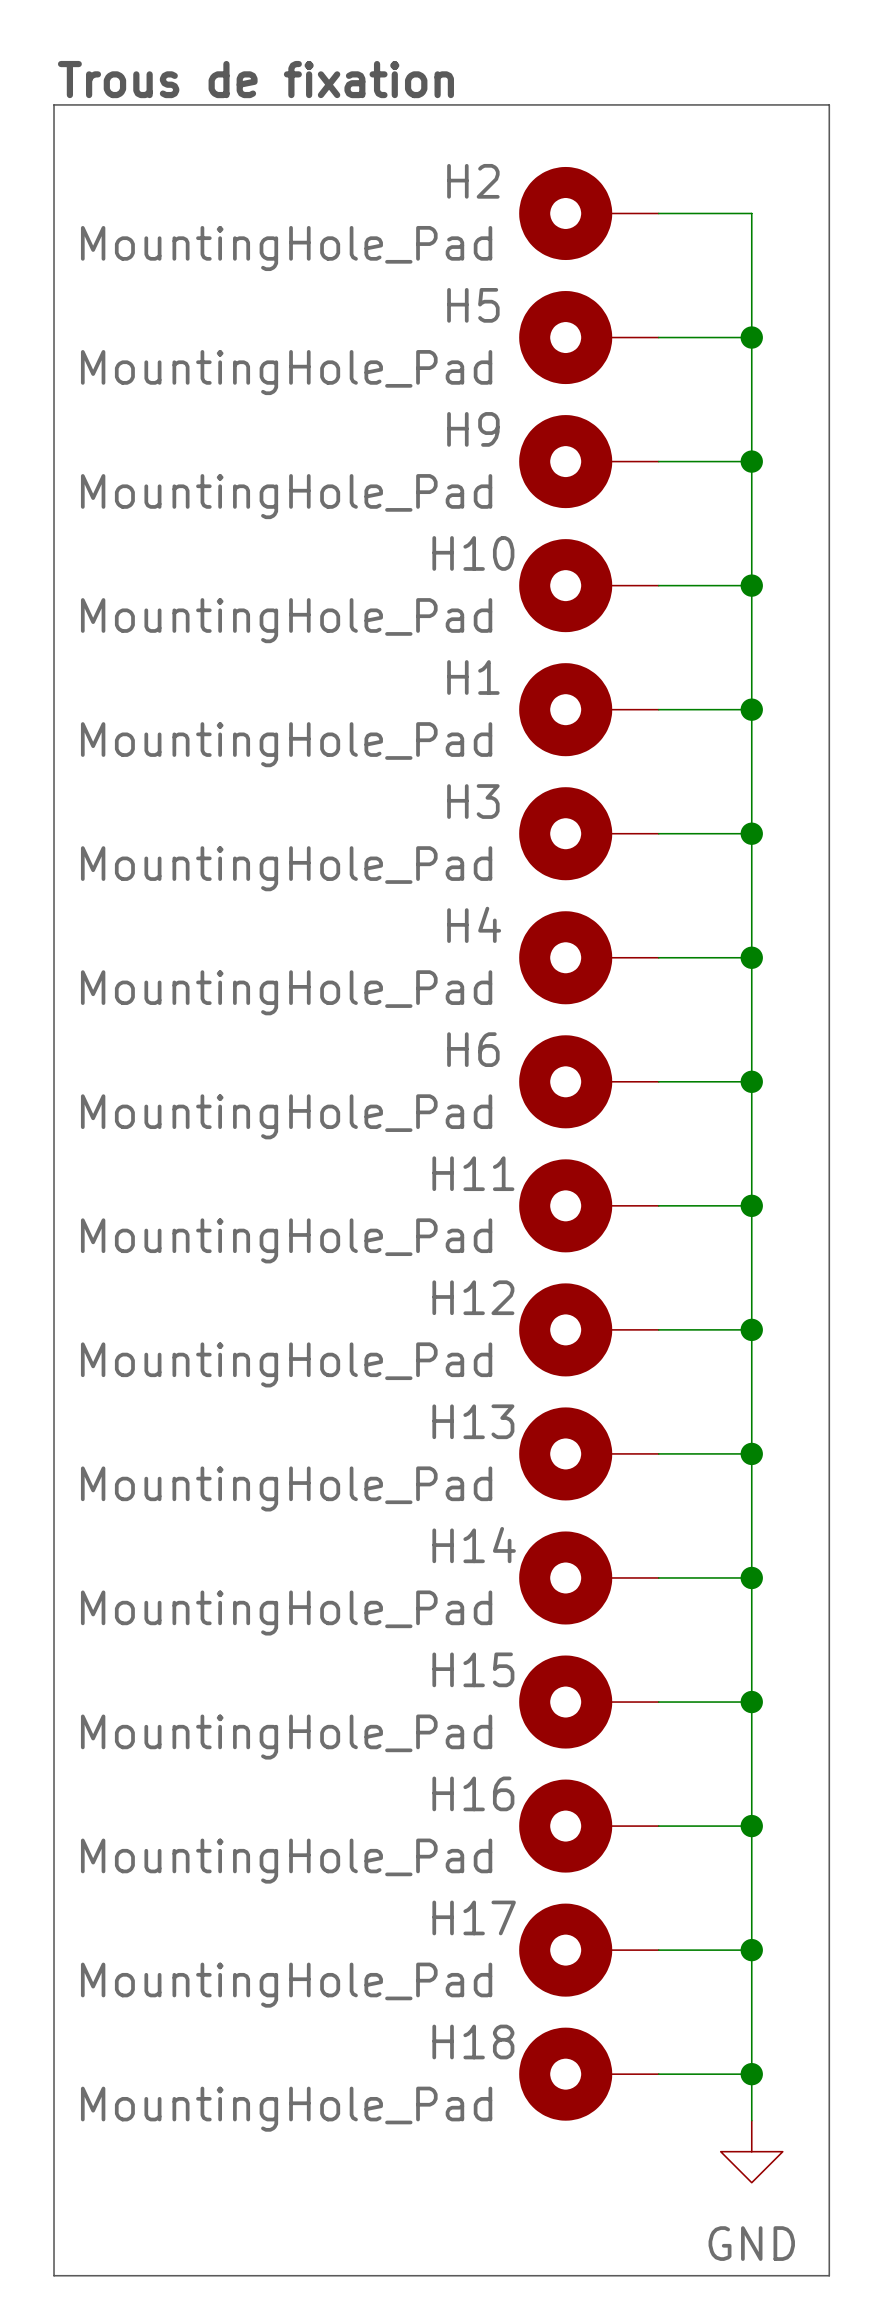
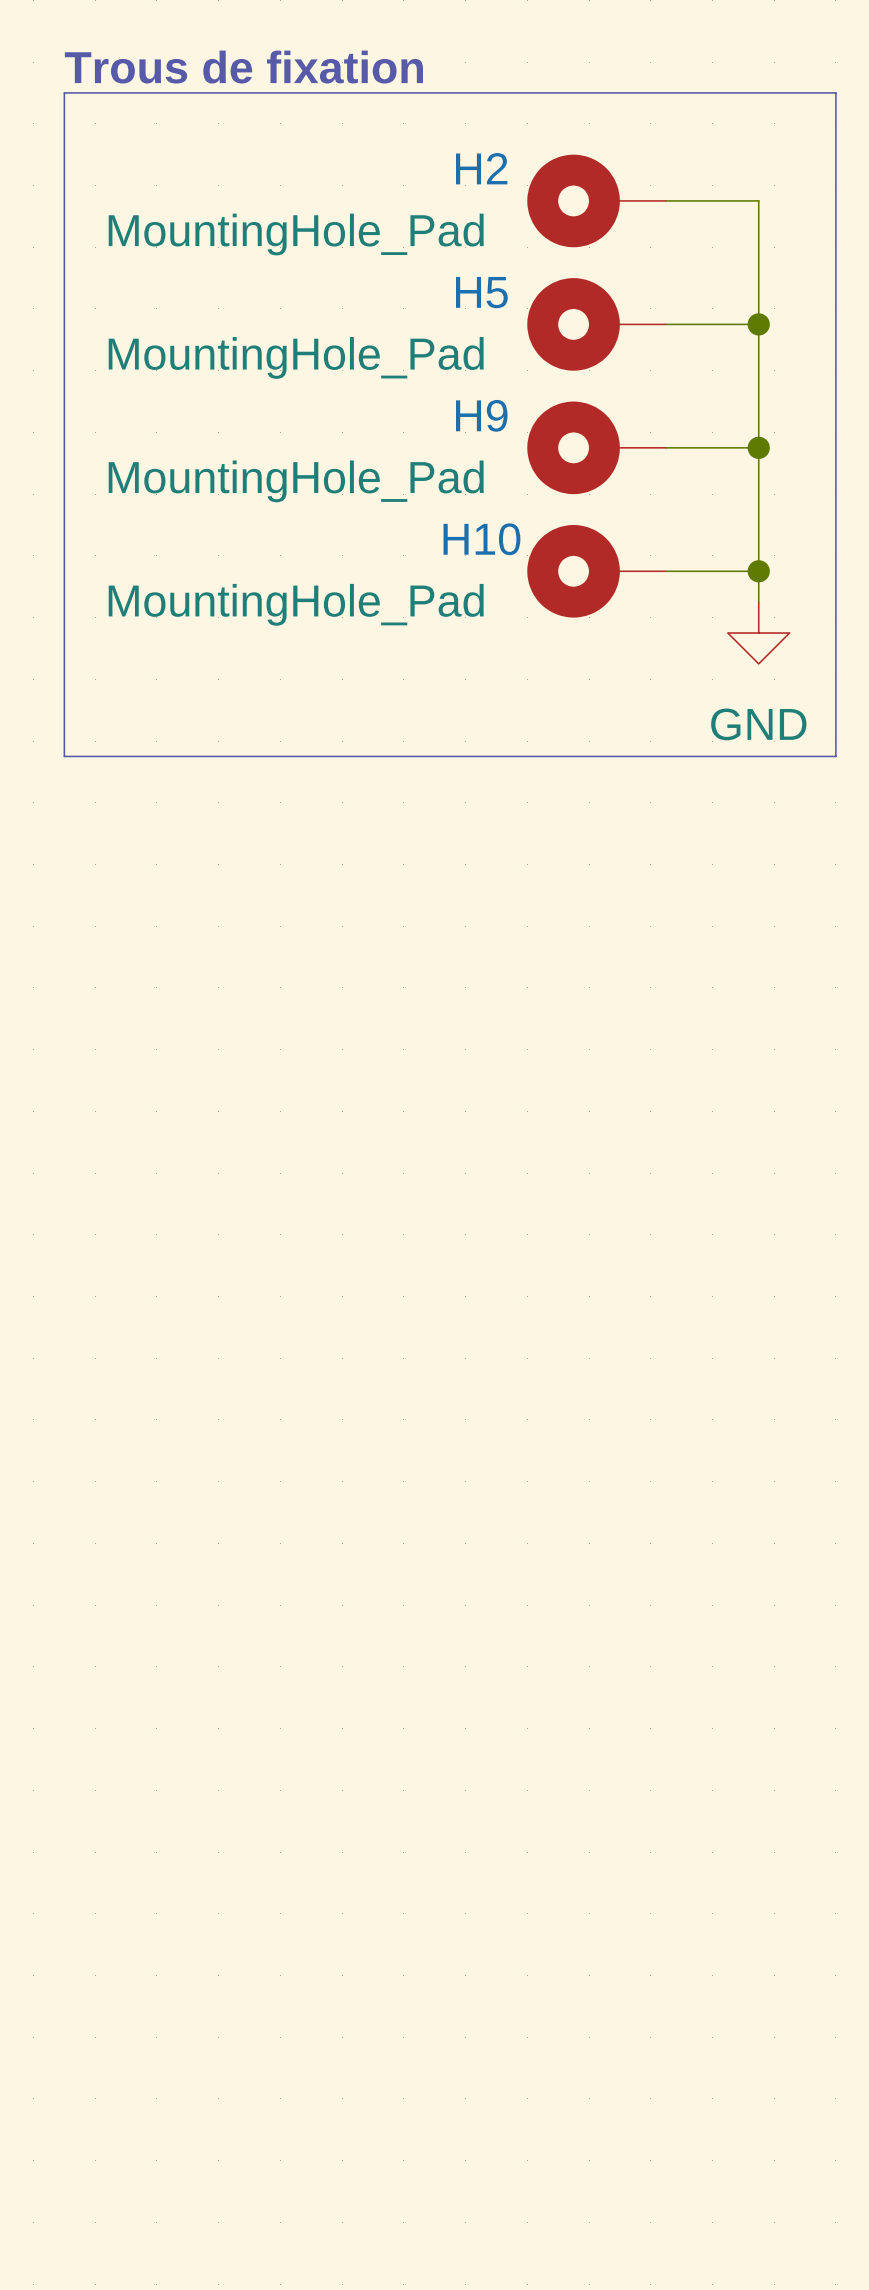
wire: (751, 616) (751, 2120) -> none
power symbol: none -> GND (758, 633)
H1: MountingHole_Pad (588, 709) -> none
wire: (658, 709) (751, 709) -> none
junction: (751, 709) -> none
line: (54, 771) (54, 2275) (829, 2275) (829, 771) -> (64, 756) (835, 756)
H3: MountingHole_Pad (588, 833) -> none
wire: (658, 833) (751, 833) -> none
junction: (751, 833) -> none
H4: MountingHole_Pad (588, 957) -> none
wire: (658, 957) (751, 957) -> none
junction: (751, 957) -> none
H6: MountingHole_Pad (588, 1081) -> none
wire: (658, 1081) (751, 1081) -> none
junction: (751, 1081) -> none
H11: MountingHole_Pad (588, 1205) -> none
wire: (658, 1205) (751, 1205) -> none
junction: (751, 1205) -> none
H12: MountingHole_Pad (588, 1329) -> none
wire: (658, 1329) (751, 1329) -> none
junction: (751, 1329) -> none
H13: MountingHole_Pad (588, 1453) -> none
wire: (658, 1453) (751, 1453) -> none
junction: (751, 1453) -> none
H14: MountingHole_Pad (588, 1577) -> none
wire: (658, 1577) (751, 1577) -> none
junction: (751, 1577) -> none
H15: MountingHole_Pad (588, 1702) -> none
wire: (658, 1702) (751, 1702) -> none
junction: (751, 1702) -> none
H16: MountingHole_Pad (588, 1826) -> none
wire: (658, 1826) (751, 1826) -> none
junction: (751, 1826) -> none
H17: MountingHole_Pad (588, 1950) -> none
wire: (658, 1950) (751, 1950) -> none
junction: (751, 1950) -> none
H18: MountingHole_Pad (588, 2074) -> none
wire: (658, 2074) (751, 2074) -> none
junction: (751, 2074) -> none
power symbol: GND (751, 2151) -> none

